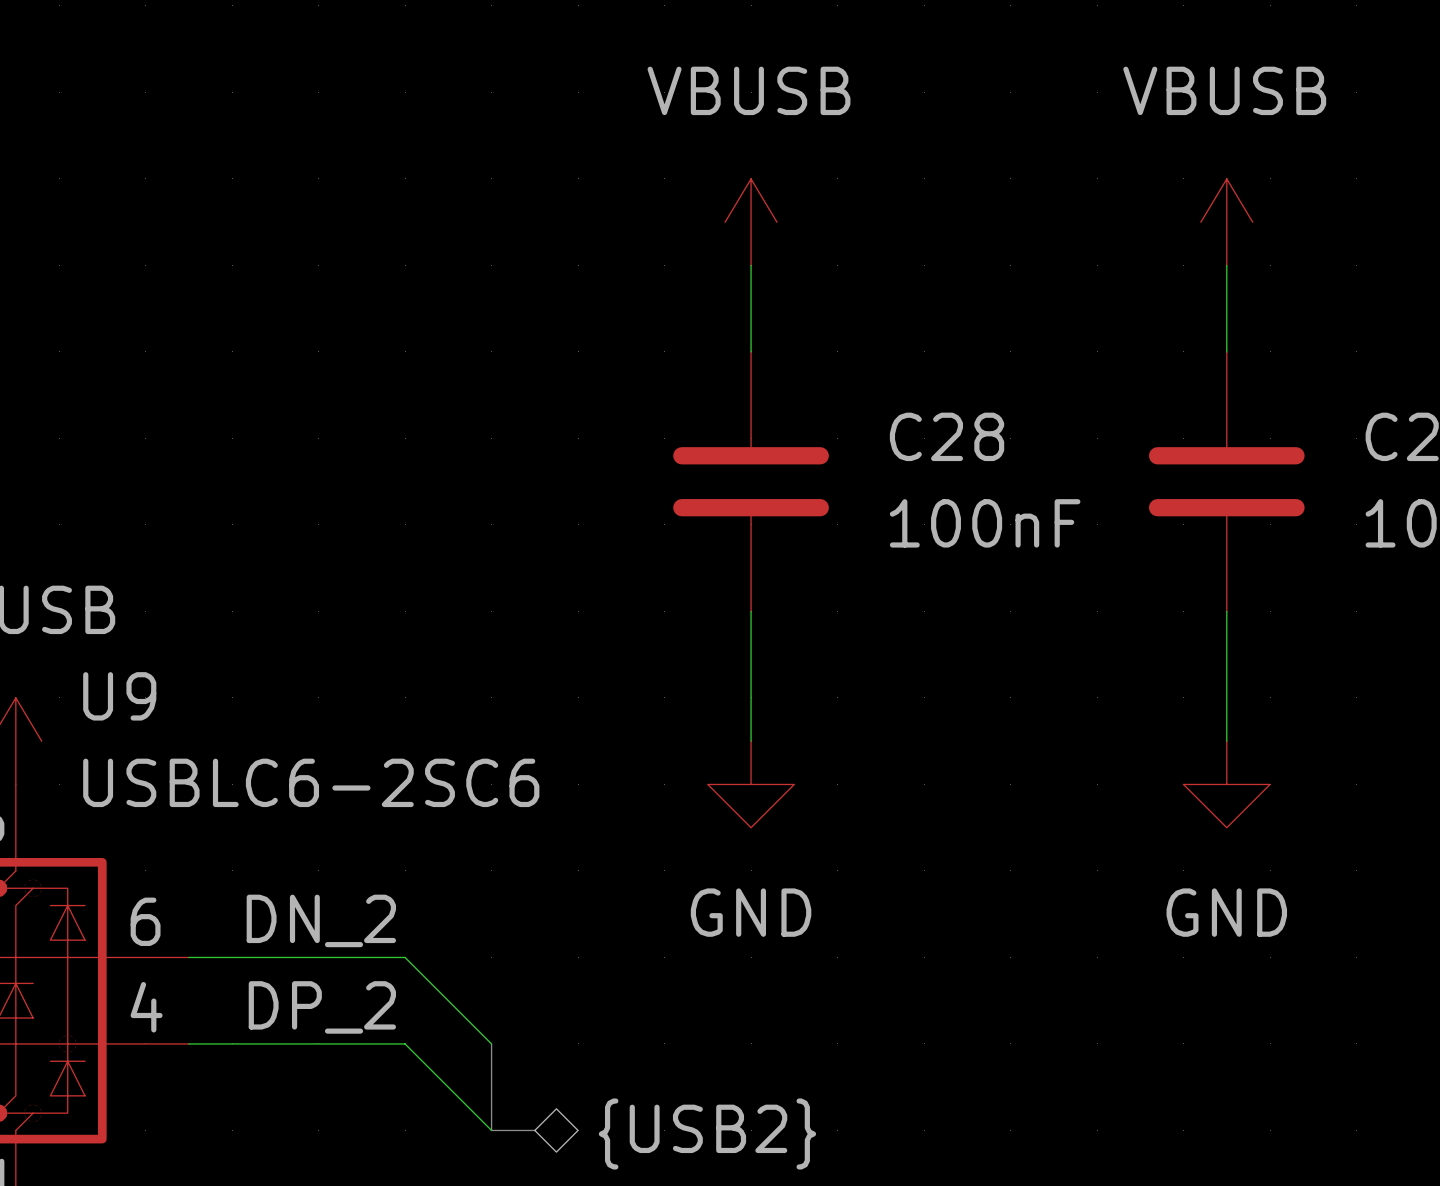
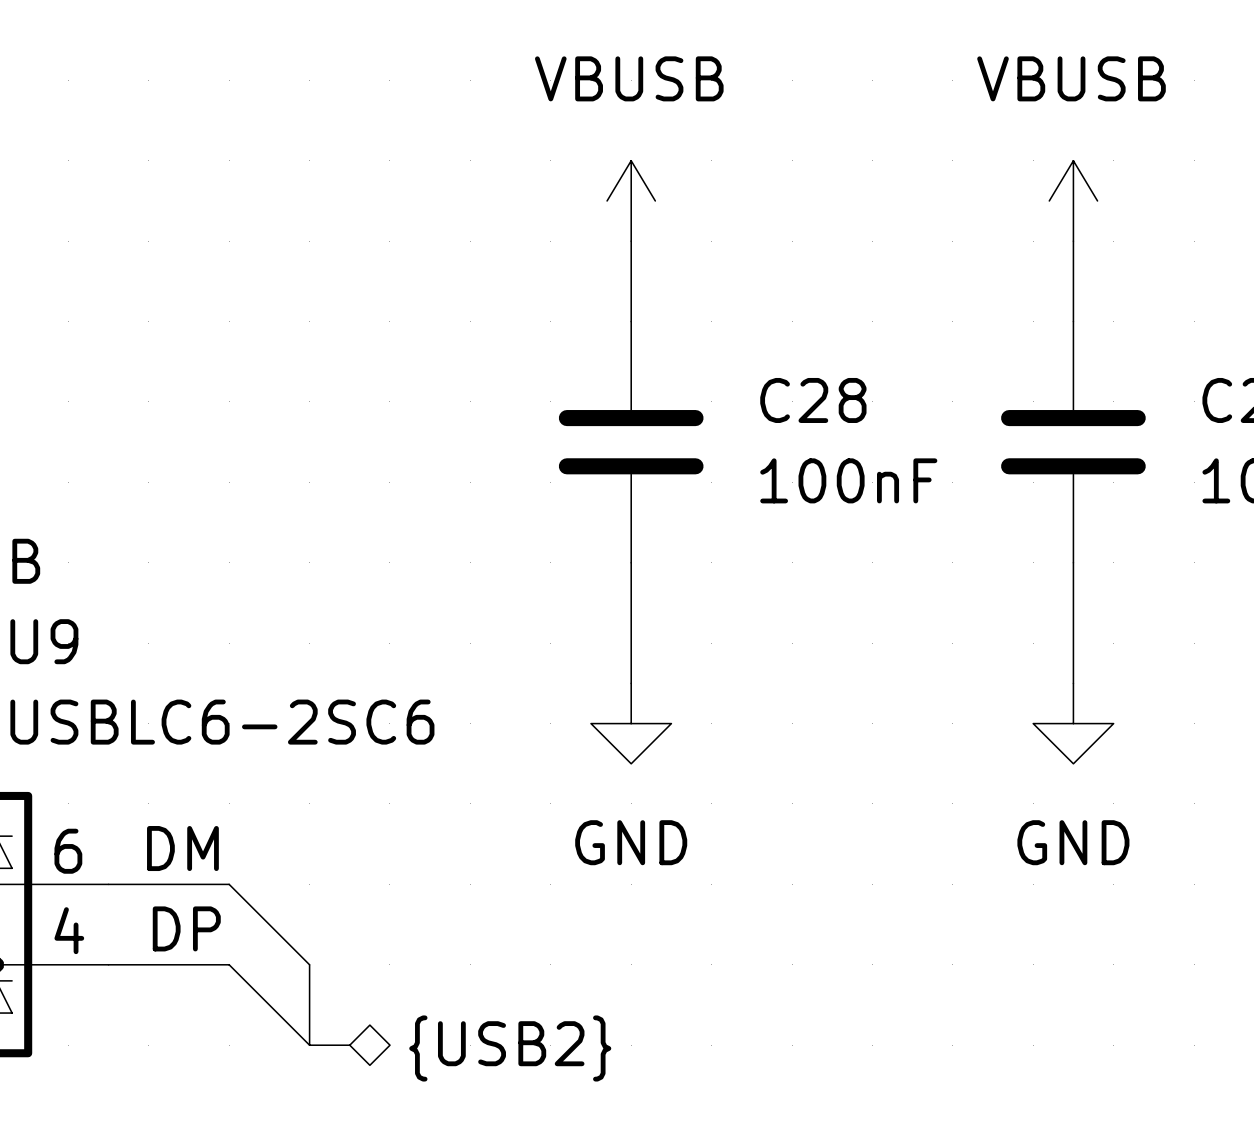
label: none -> DM (182, 848)
label: DN_2 (321, 920) -> none
wire: (318, 957) (405, 957) (491, 1043) -> (229, 884) (309, 964)
label: DP_2 (322, 1007) -> DP (186, 928)
wire: (318, 1043) (405, 1043) (491, 1130) -> (229, 964) (309, 1045)
bus: (491, 1043) (491, 1130) (534, 1130) -> (309, 964) (309, 1045) (349, 1045)
hierarchical label position: {USB2} (707, 1133) -> {USB2} (510, 1048)

